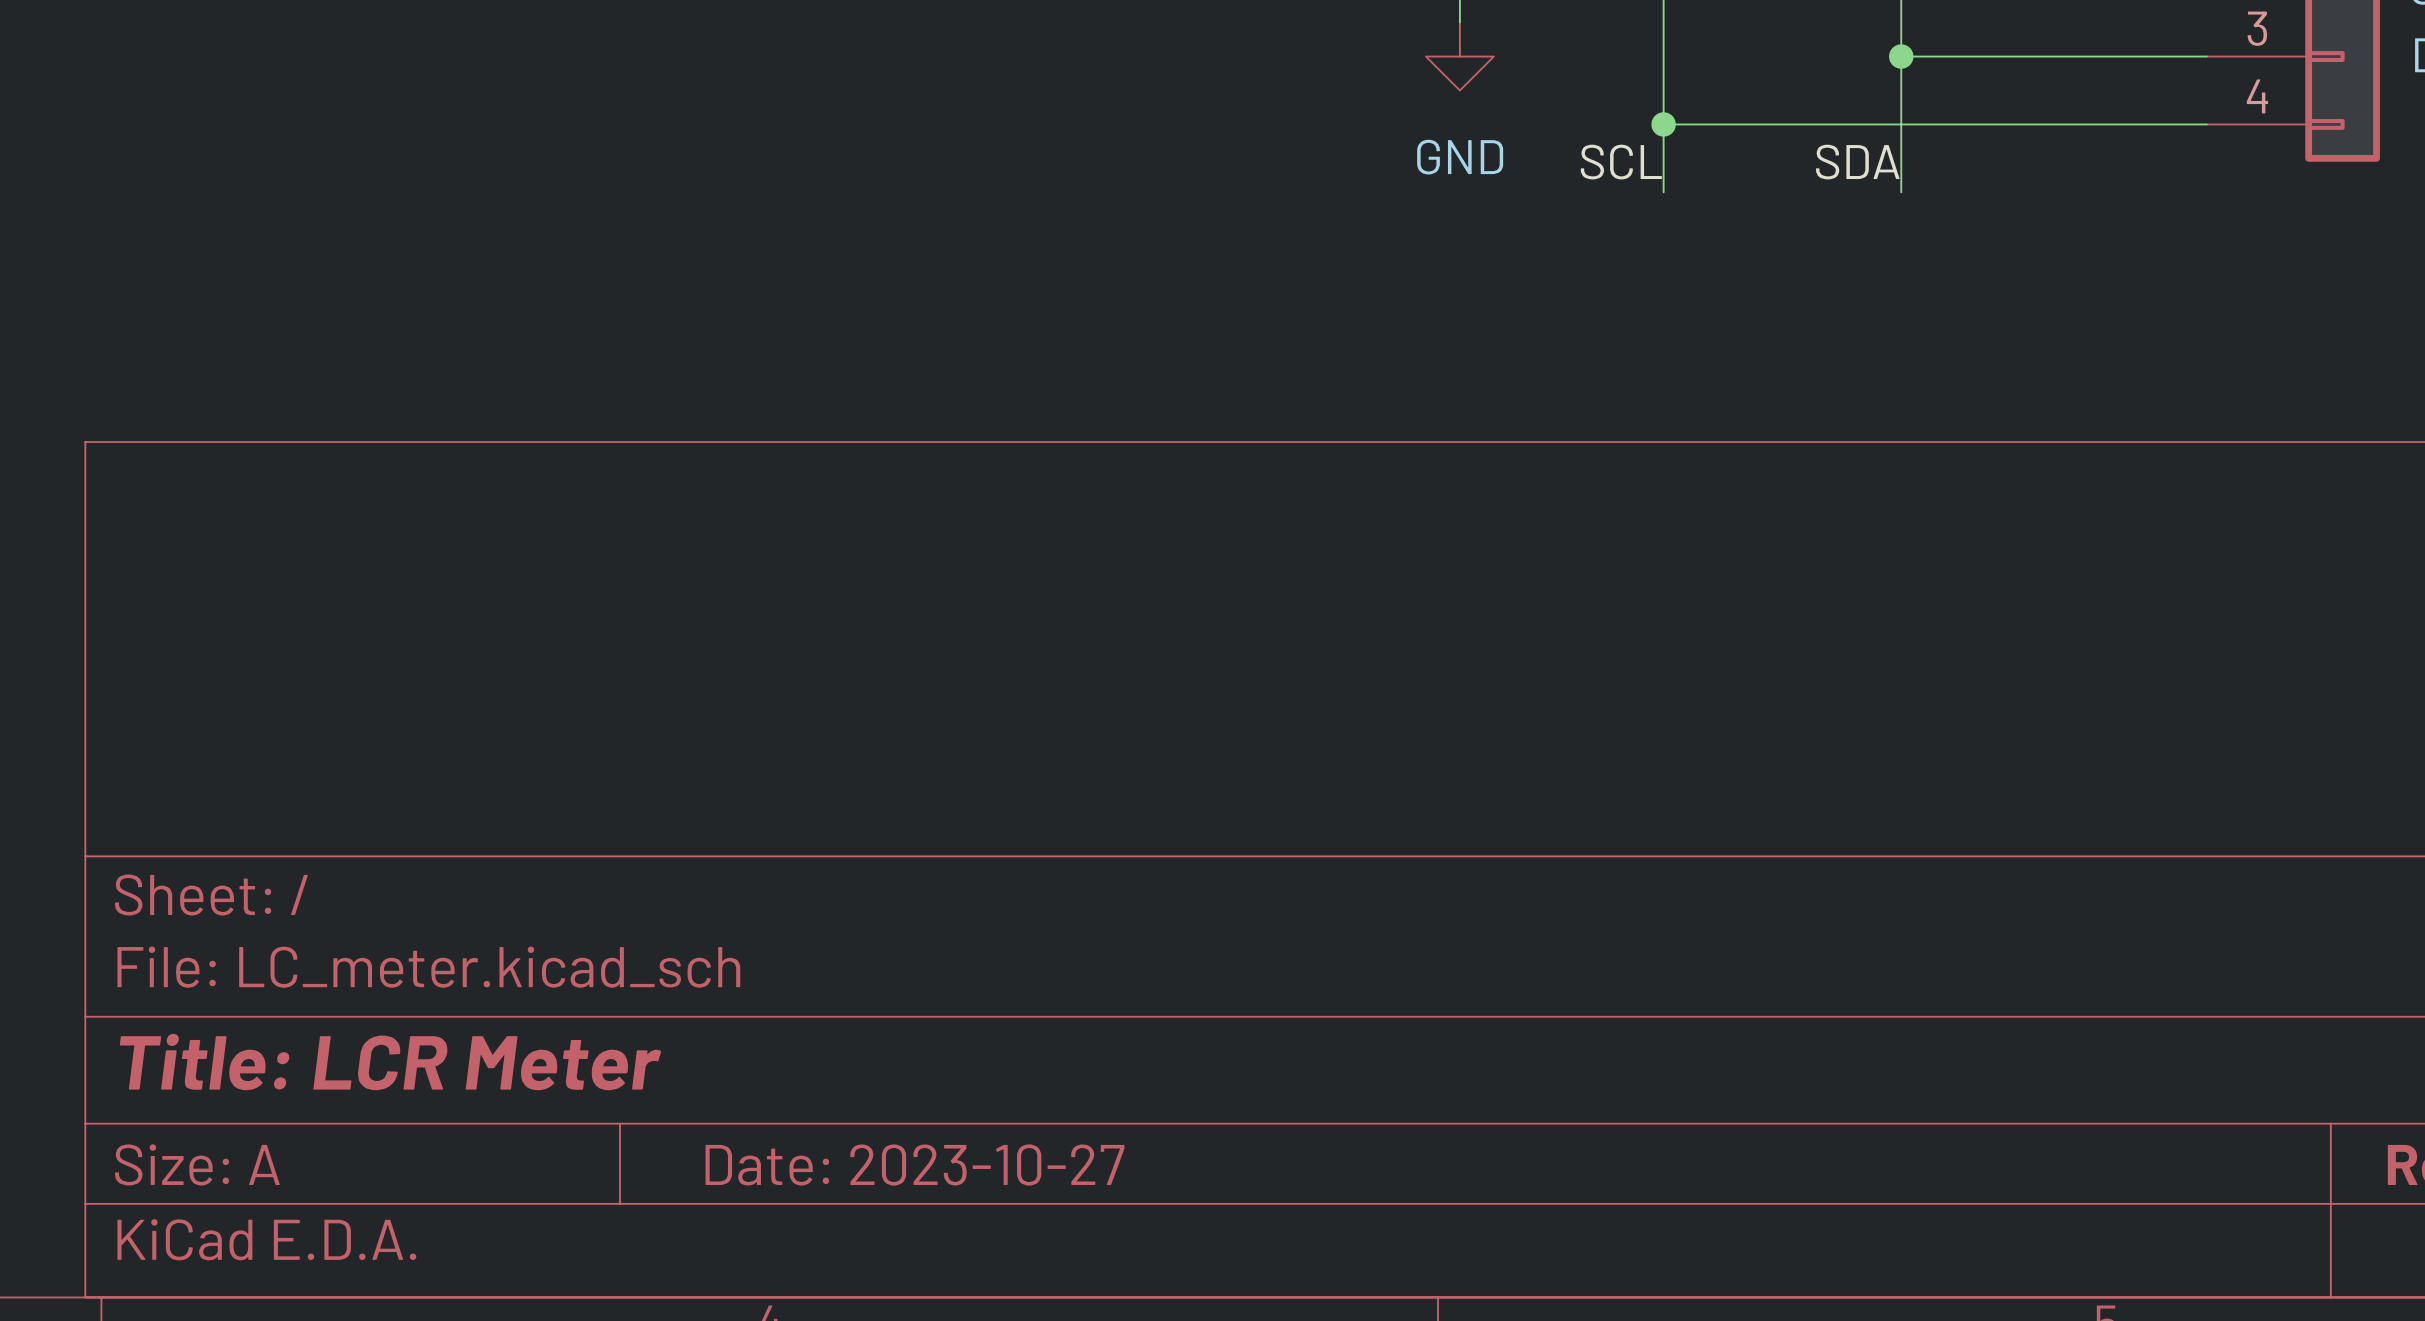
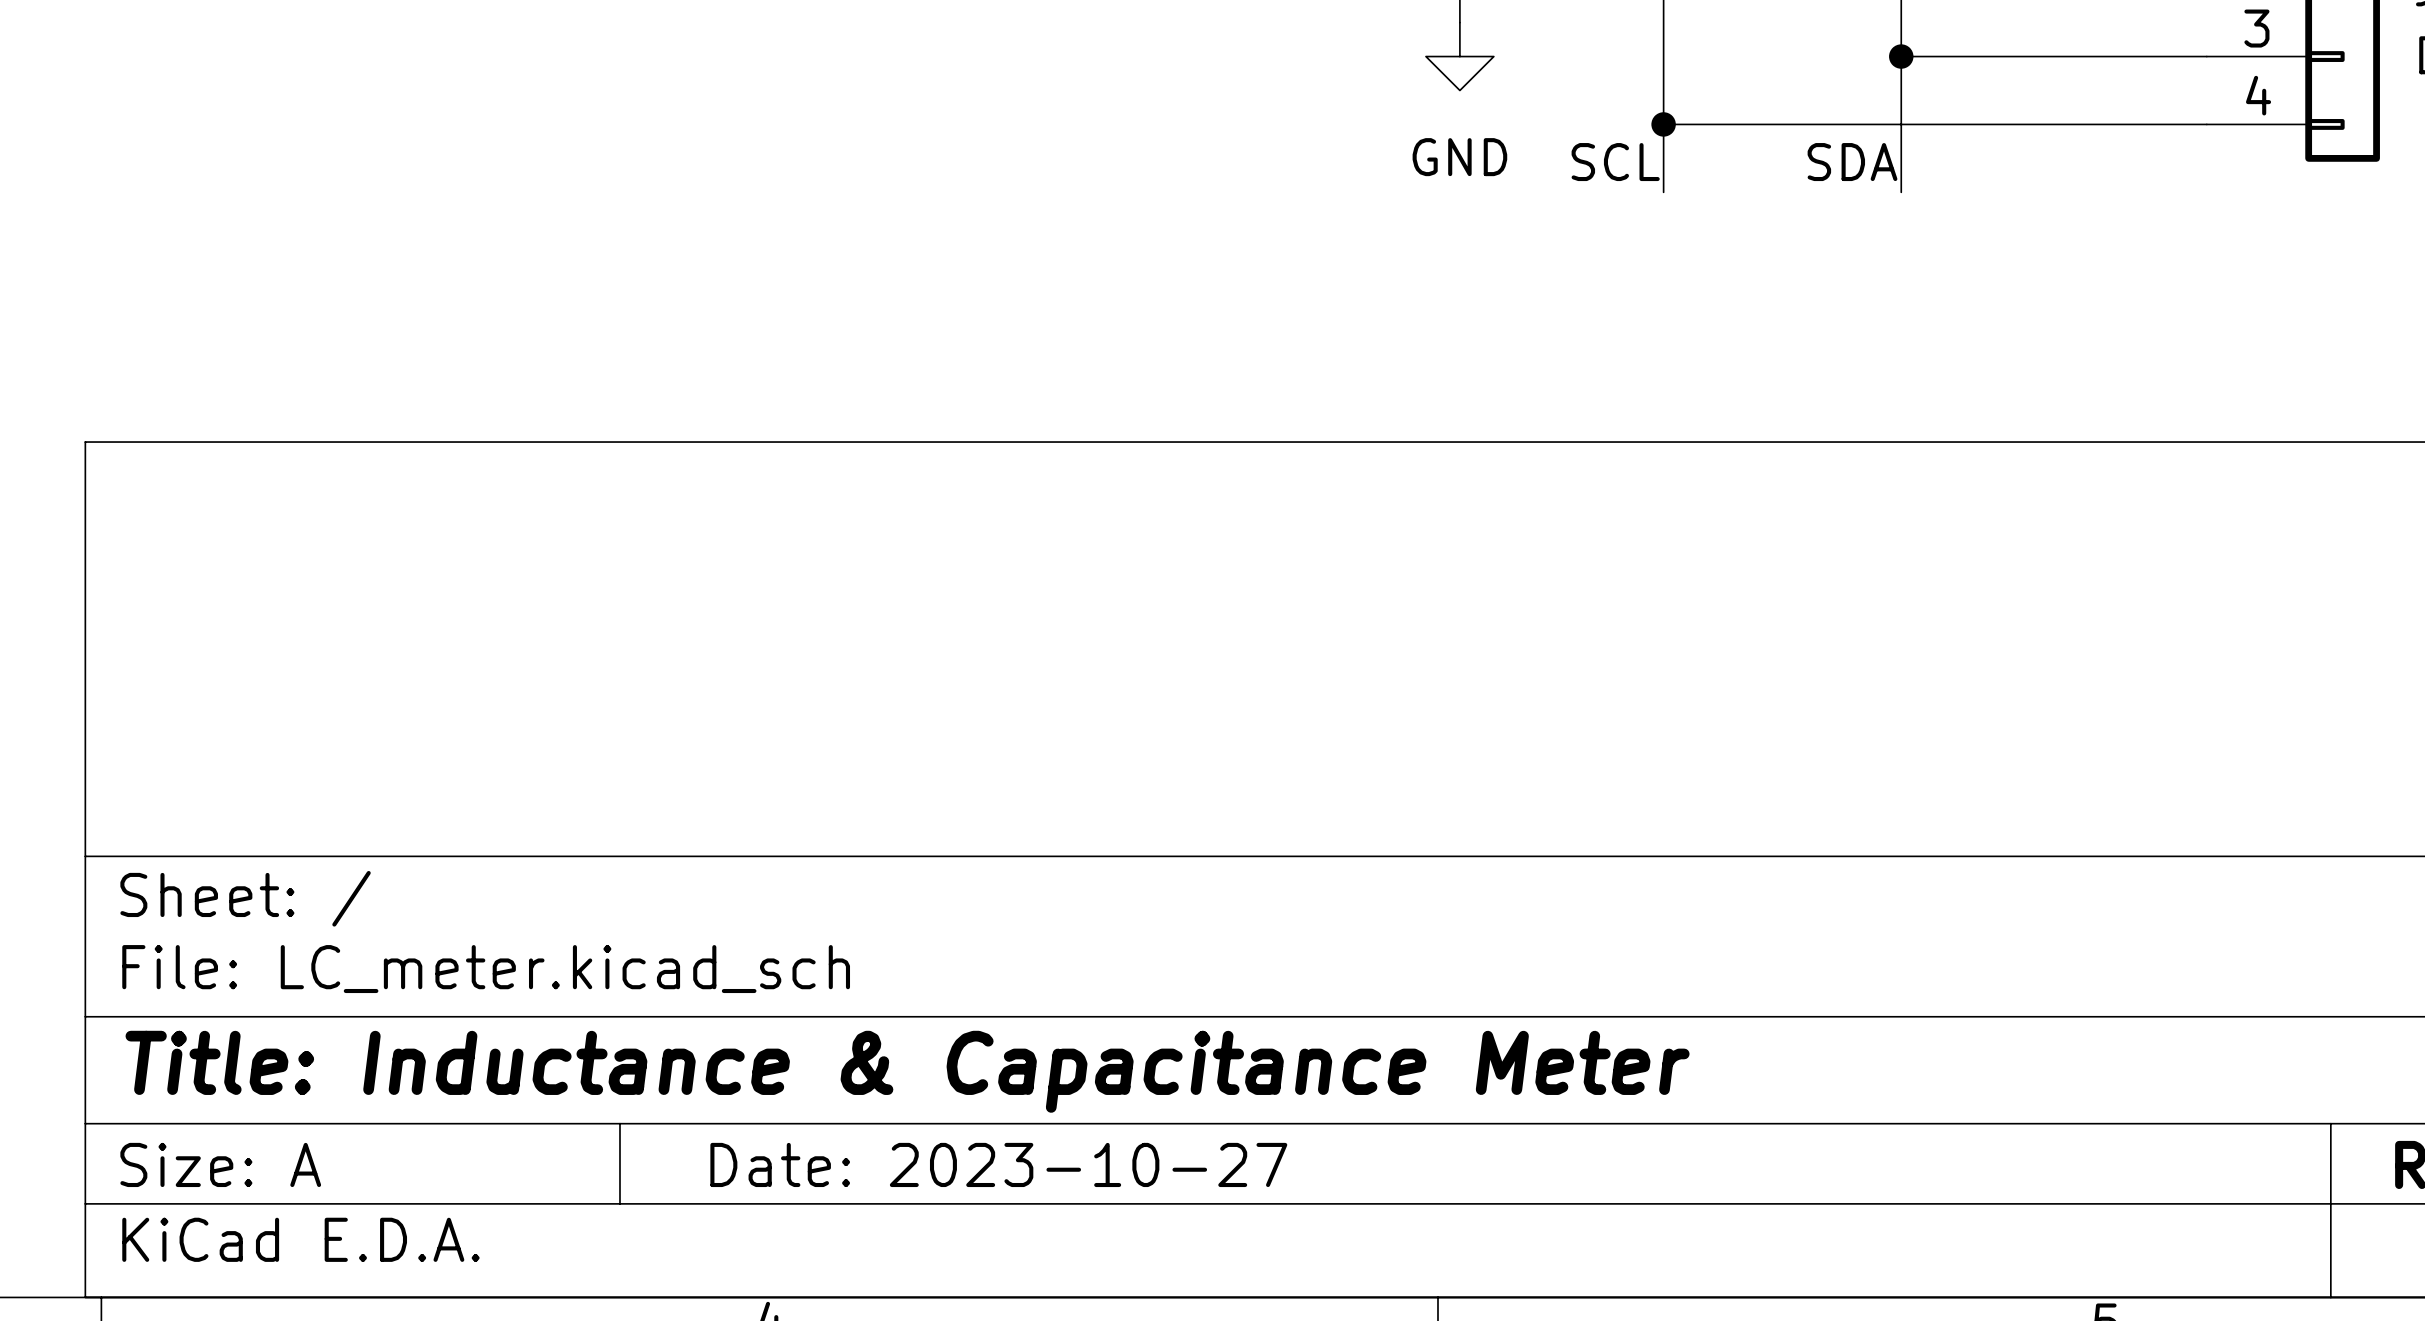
title block: Title: LCR Meter (390, 1062) -> Title: Inductance & Capacitance Meter (907, 1071)

